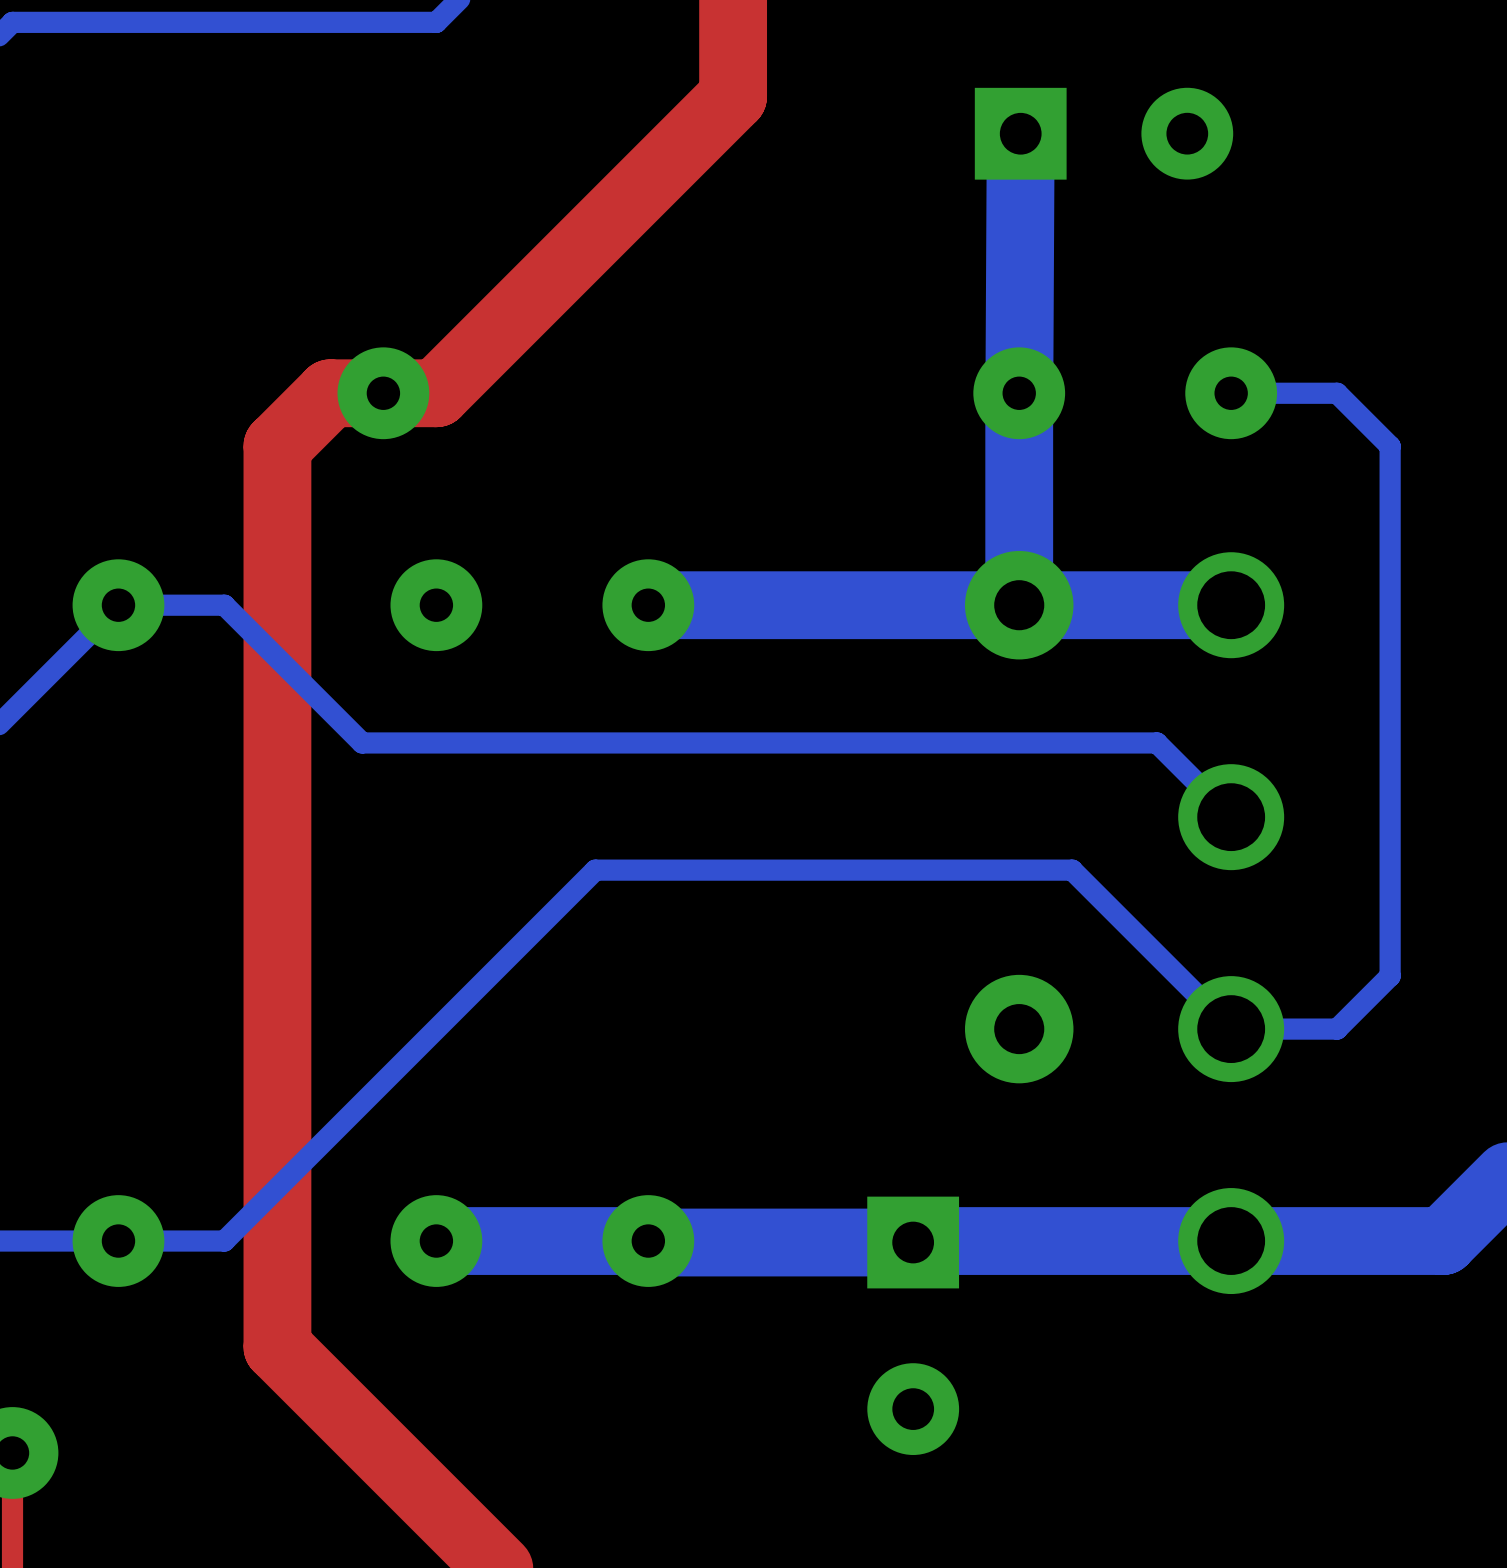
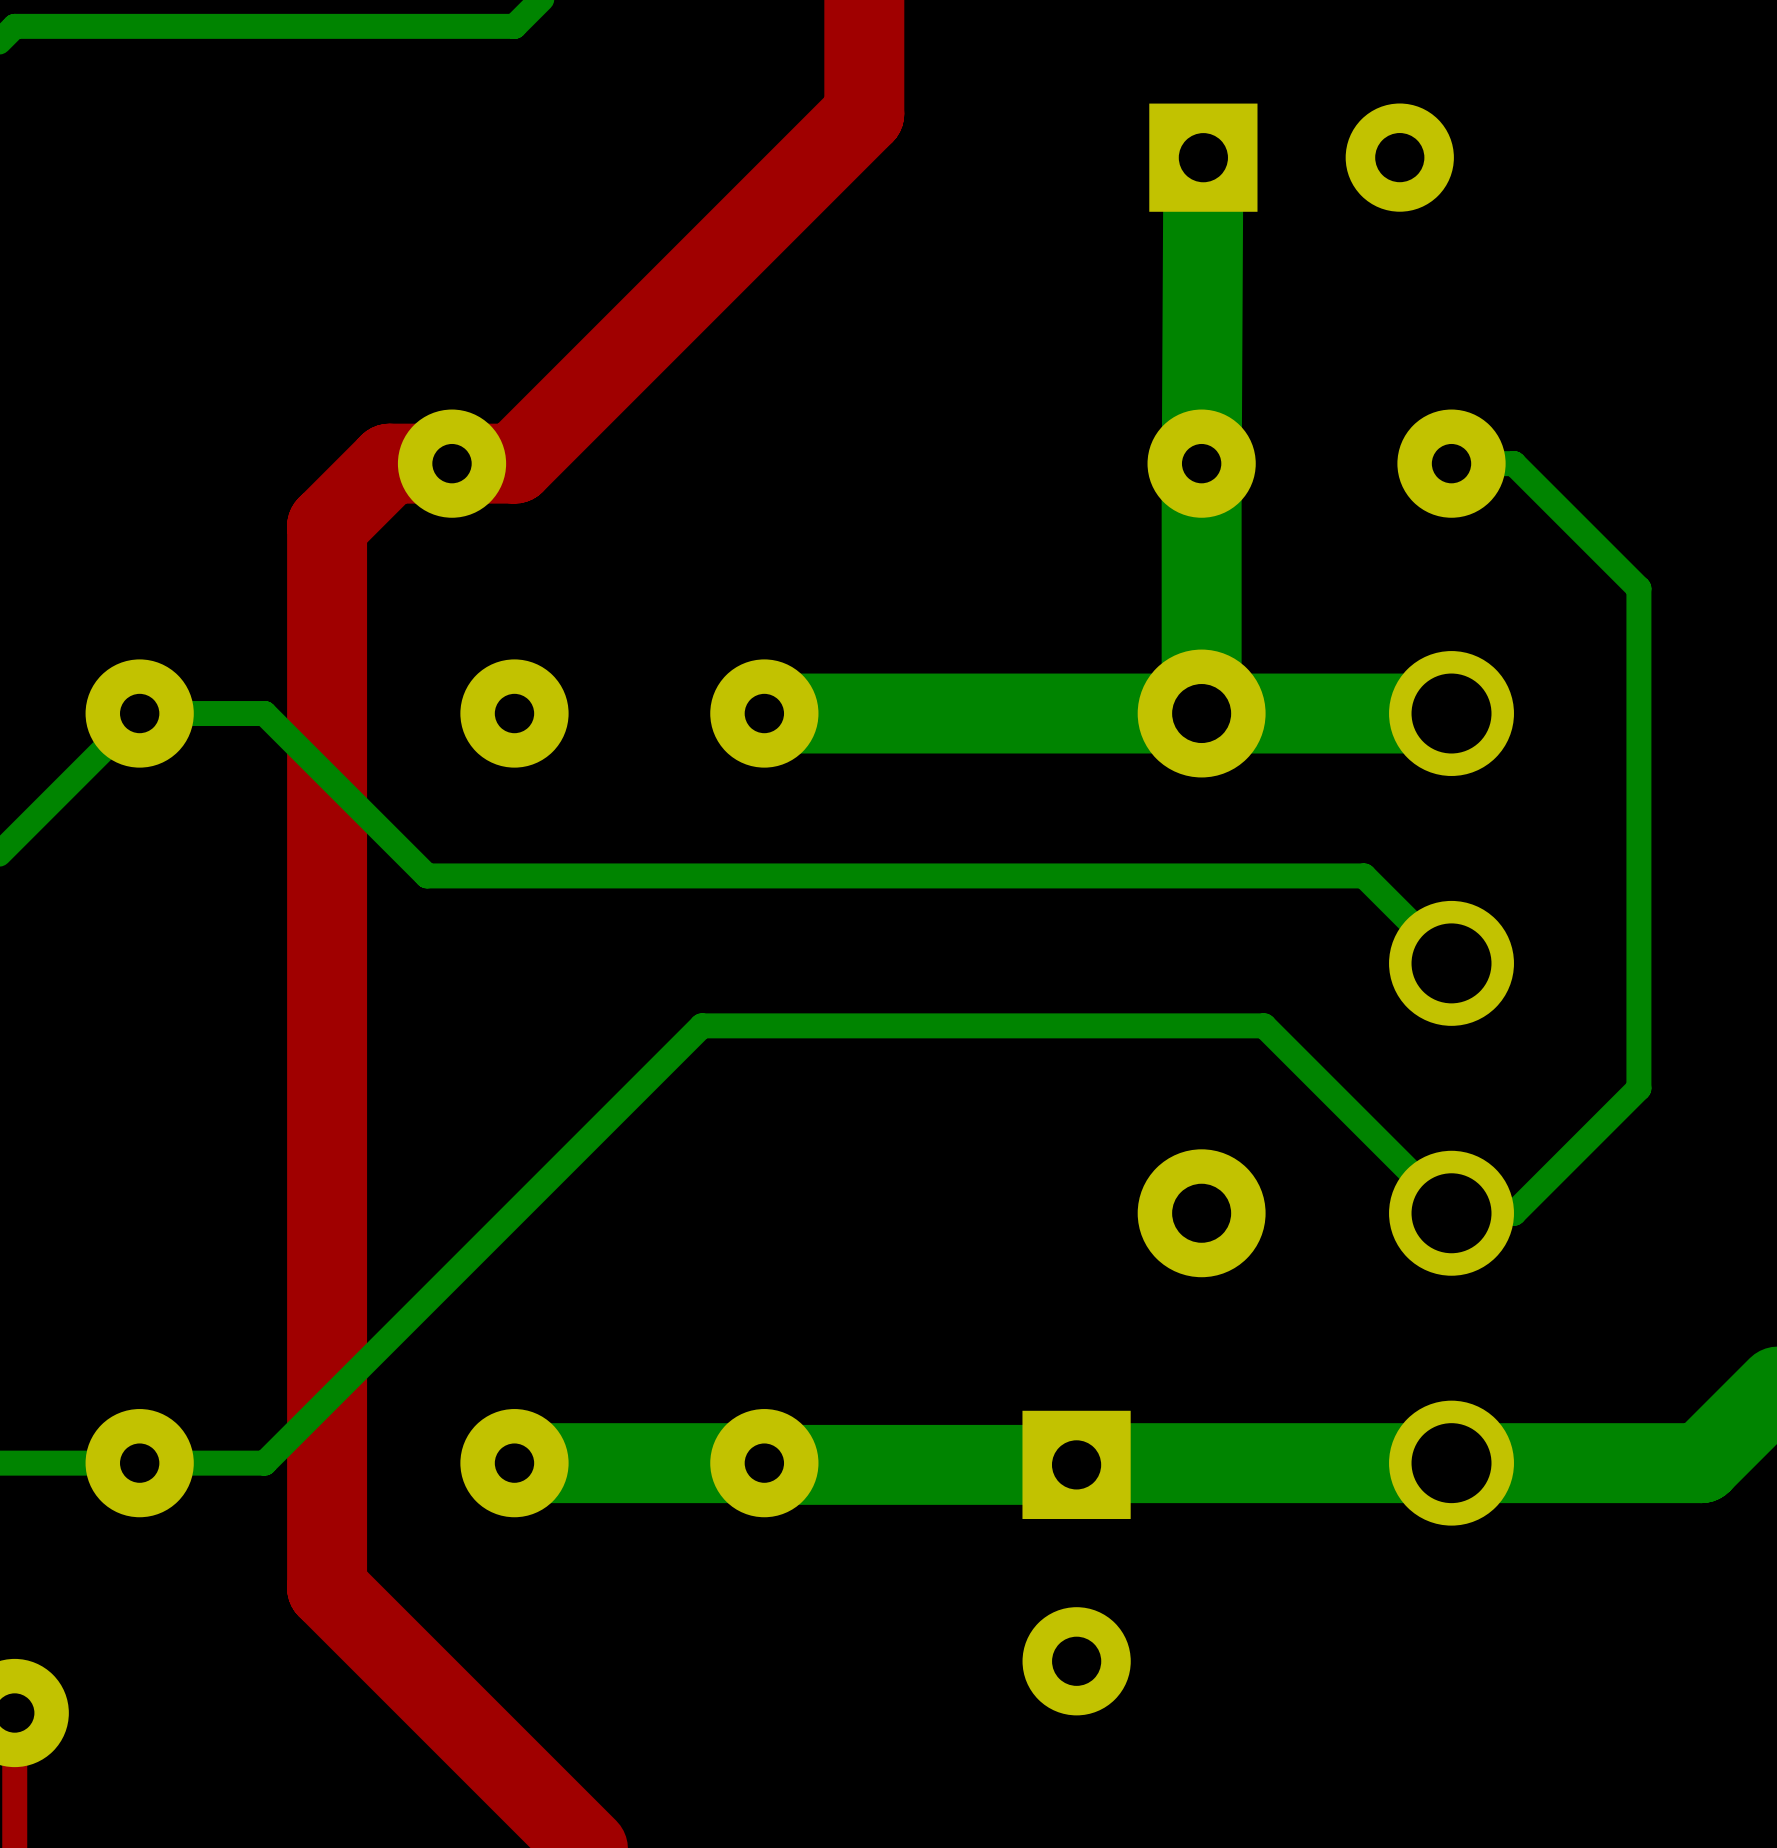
bottom track: (1284, 393) (1337, 393) (1390, 446) (1390, 499) -> (1513, 463) (1638, 588)
bottom track: (1390, 923) (1390, 976) (1337, 1029) (1284, 1029) -> (1638, 1088) (1513, 1213)

